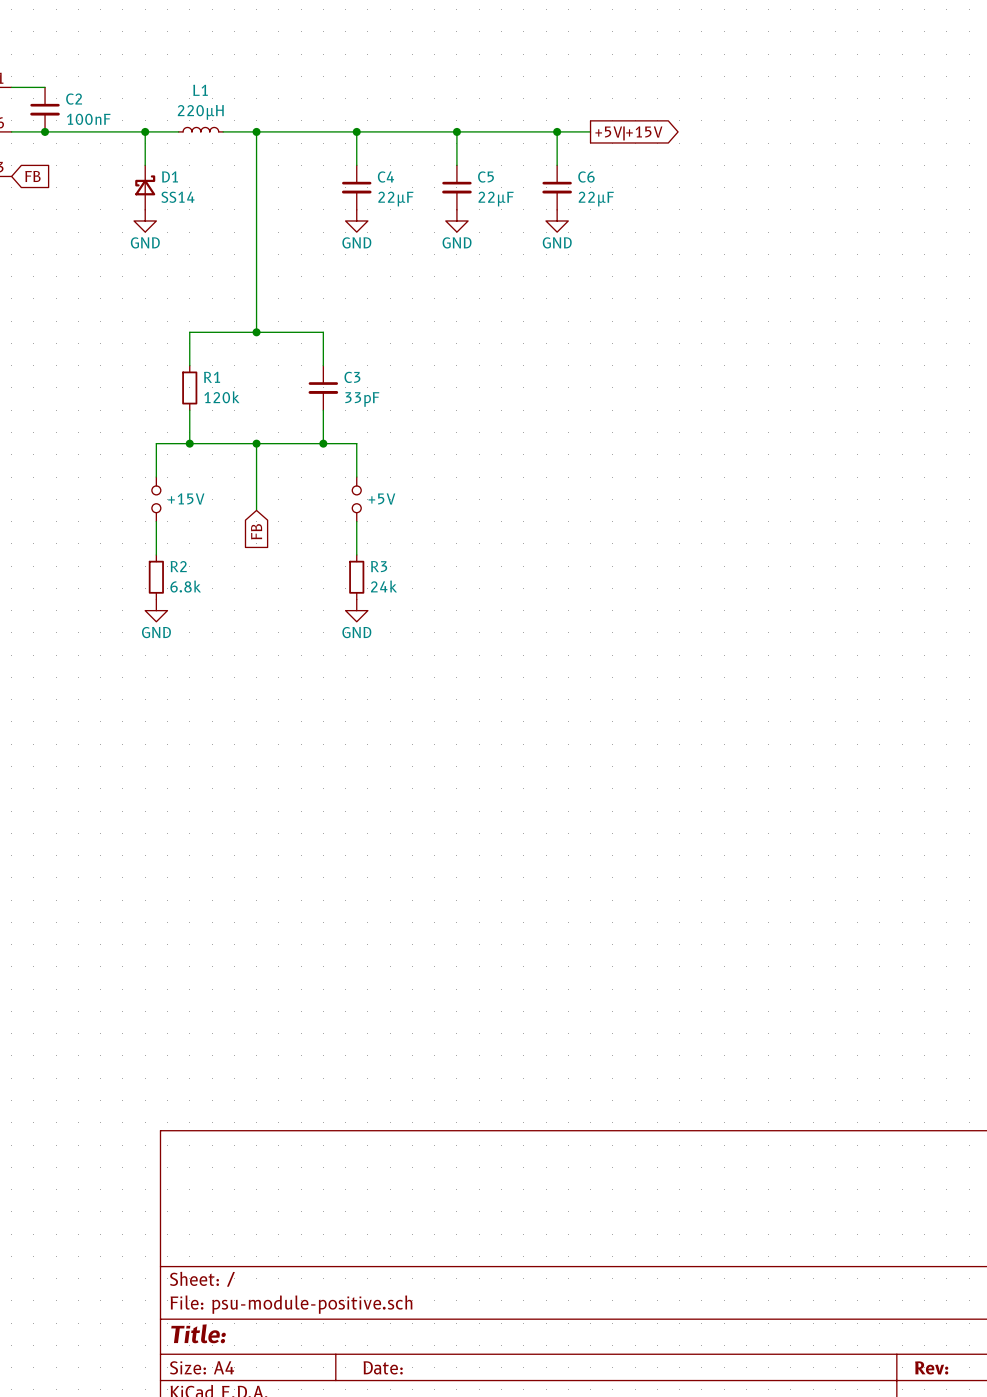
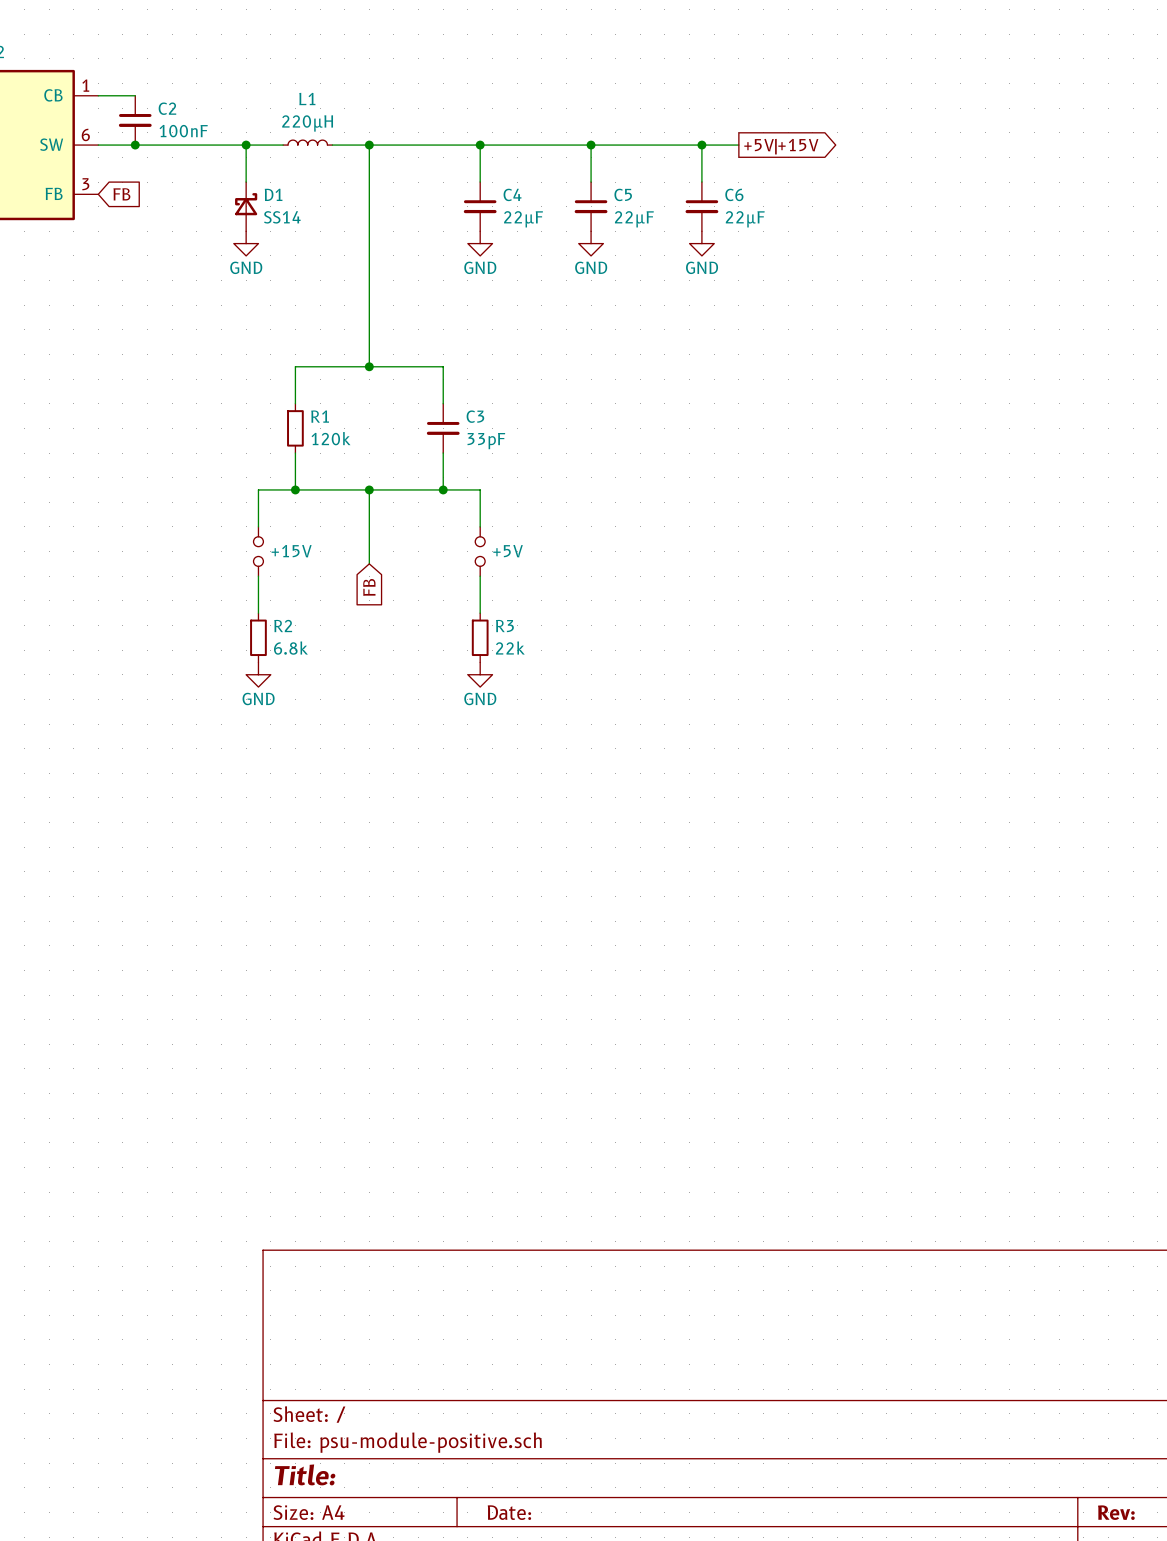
R3 value: 24k (383, 586) -> 22k (510, 648)

